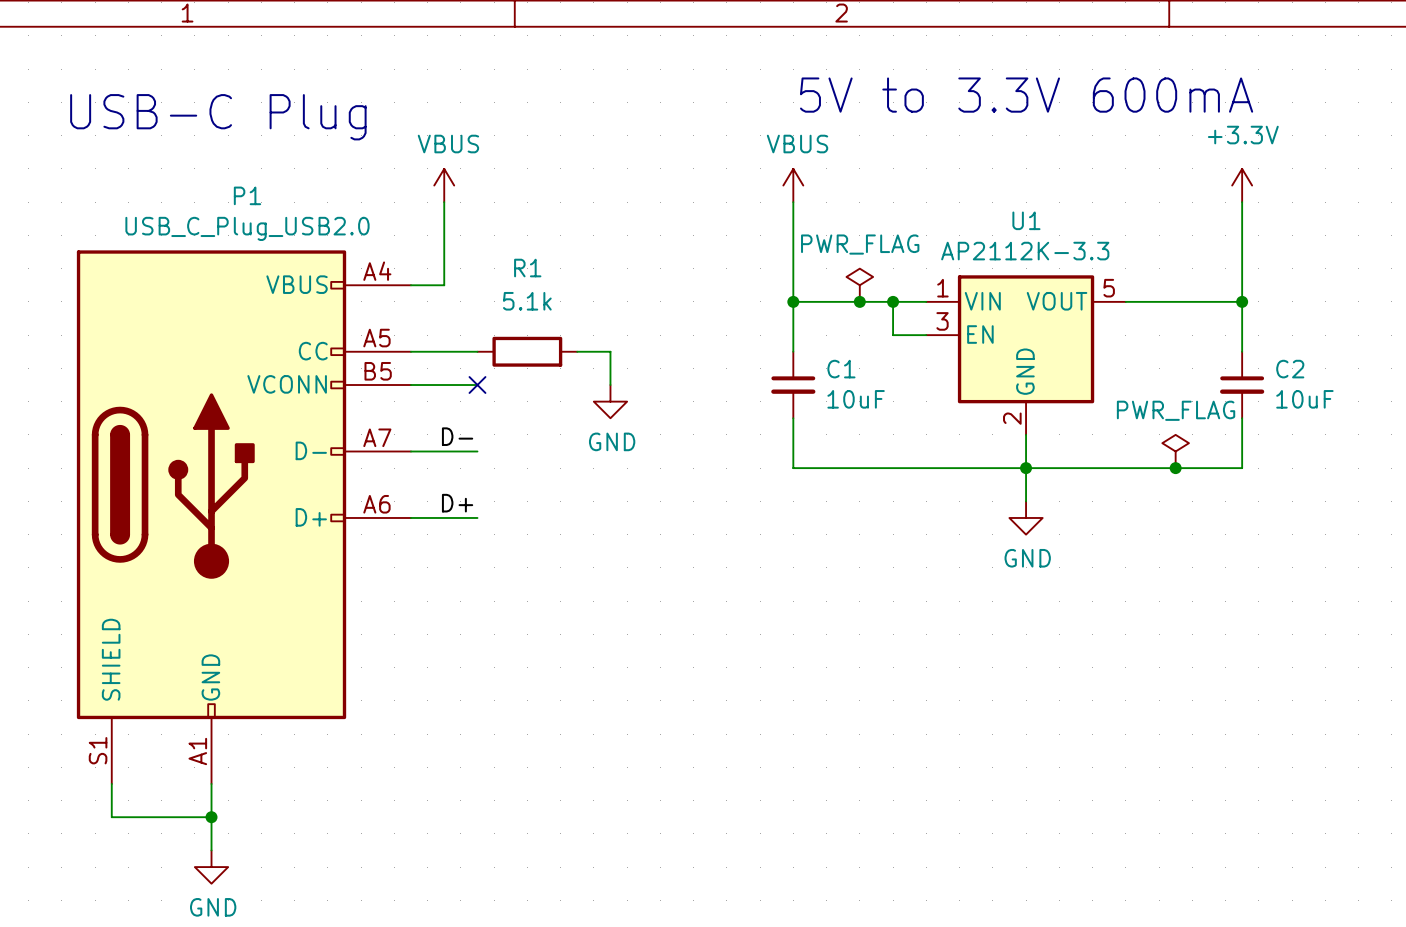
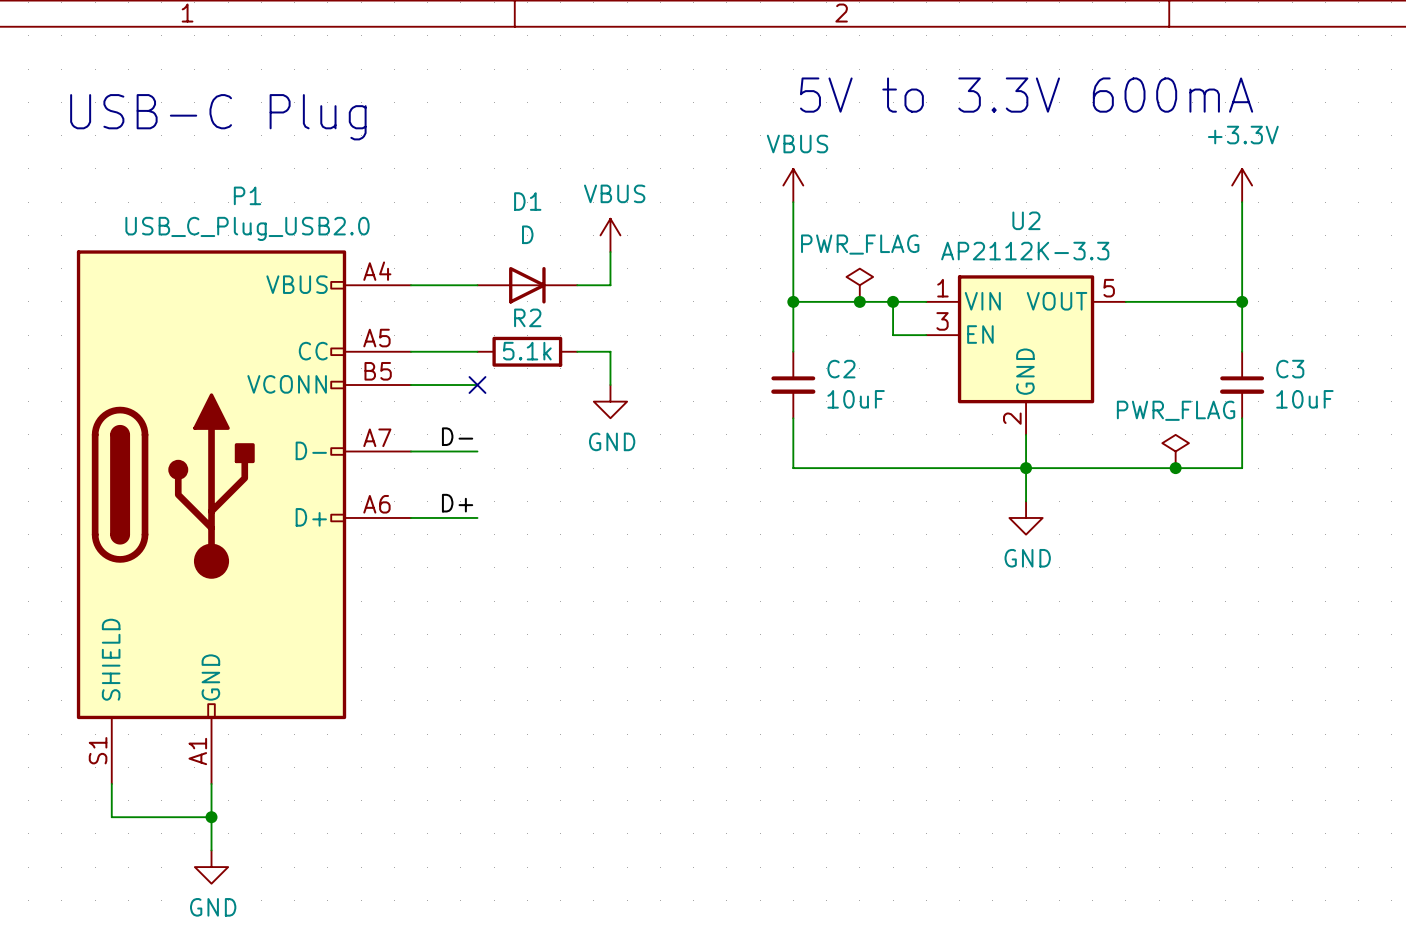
power symbol position: VBUS (444, 185) -> VBUS (610, 235)
wire: (444, 202) (444, 285) -> (477, 285) (444, 285)
U1 name: U1 (1026, 220) -> U2 (1026, 220)
wire: none -> (610, 252) (610, 285) (577, 285)
R1 name: R1 (527, 268) -> R2 (527, 317)
D1: none -> D (527, 285)
R1 value position: 5.1k (527, 301) -> 5.1k (527, 351)
C1 name: C1 (841, 369) -> C2 (841, 369)
C2 name: C2 (1290, 369) -> C3 (1290, 369)

